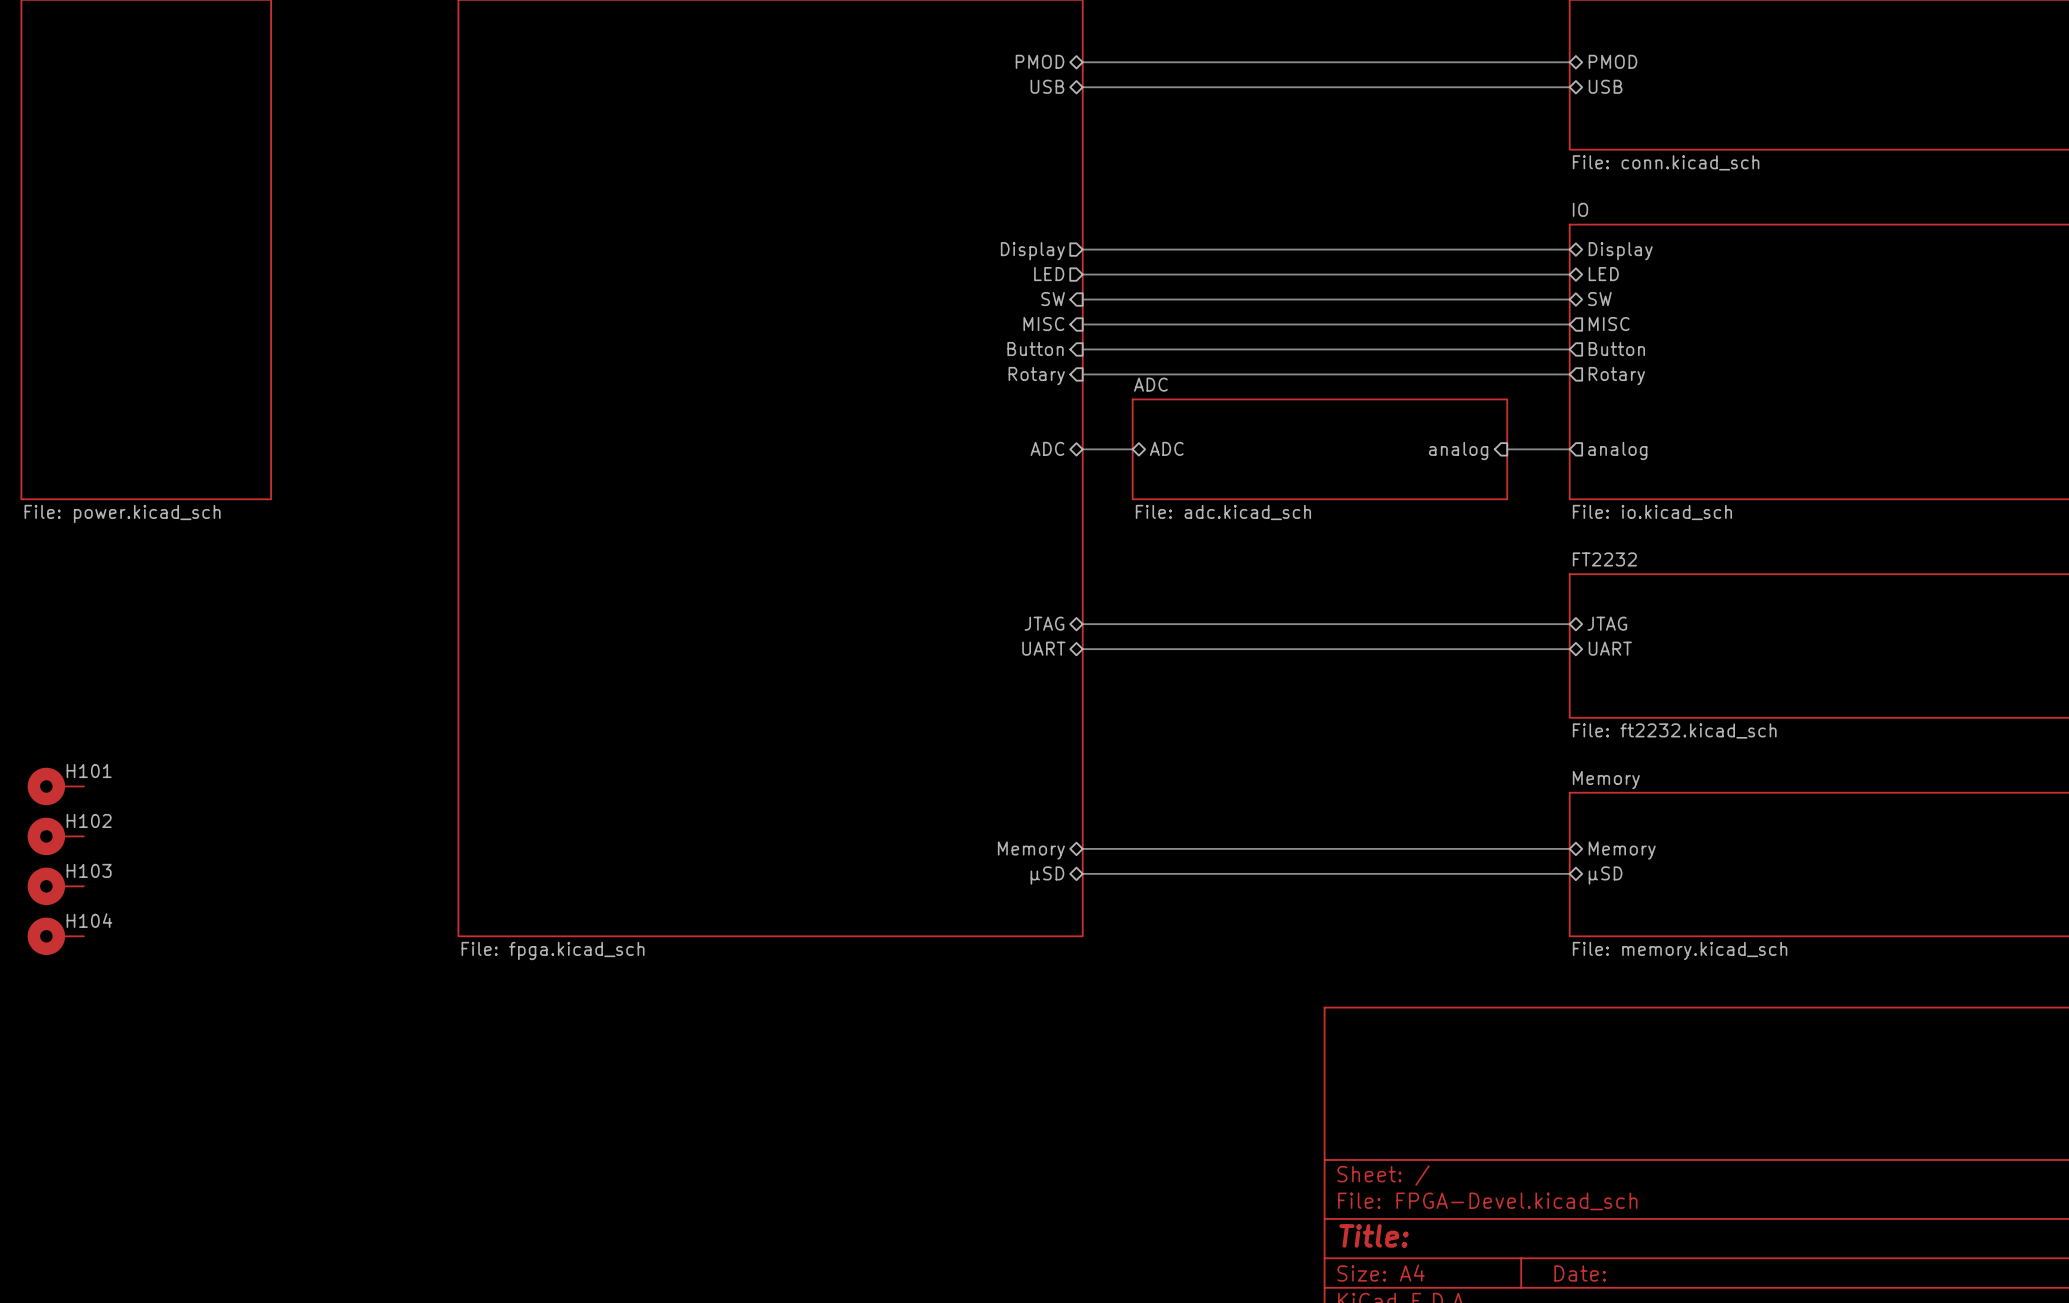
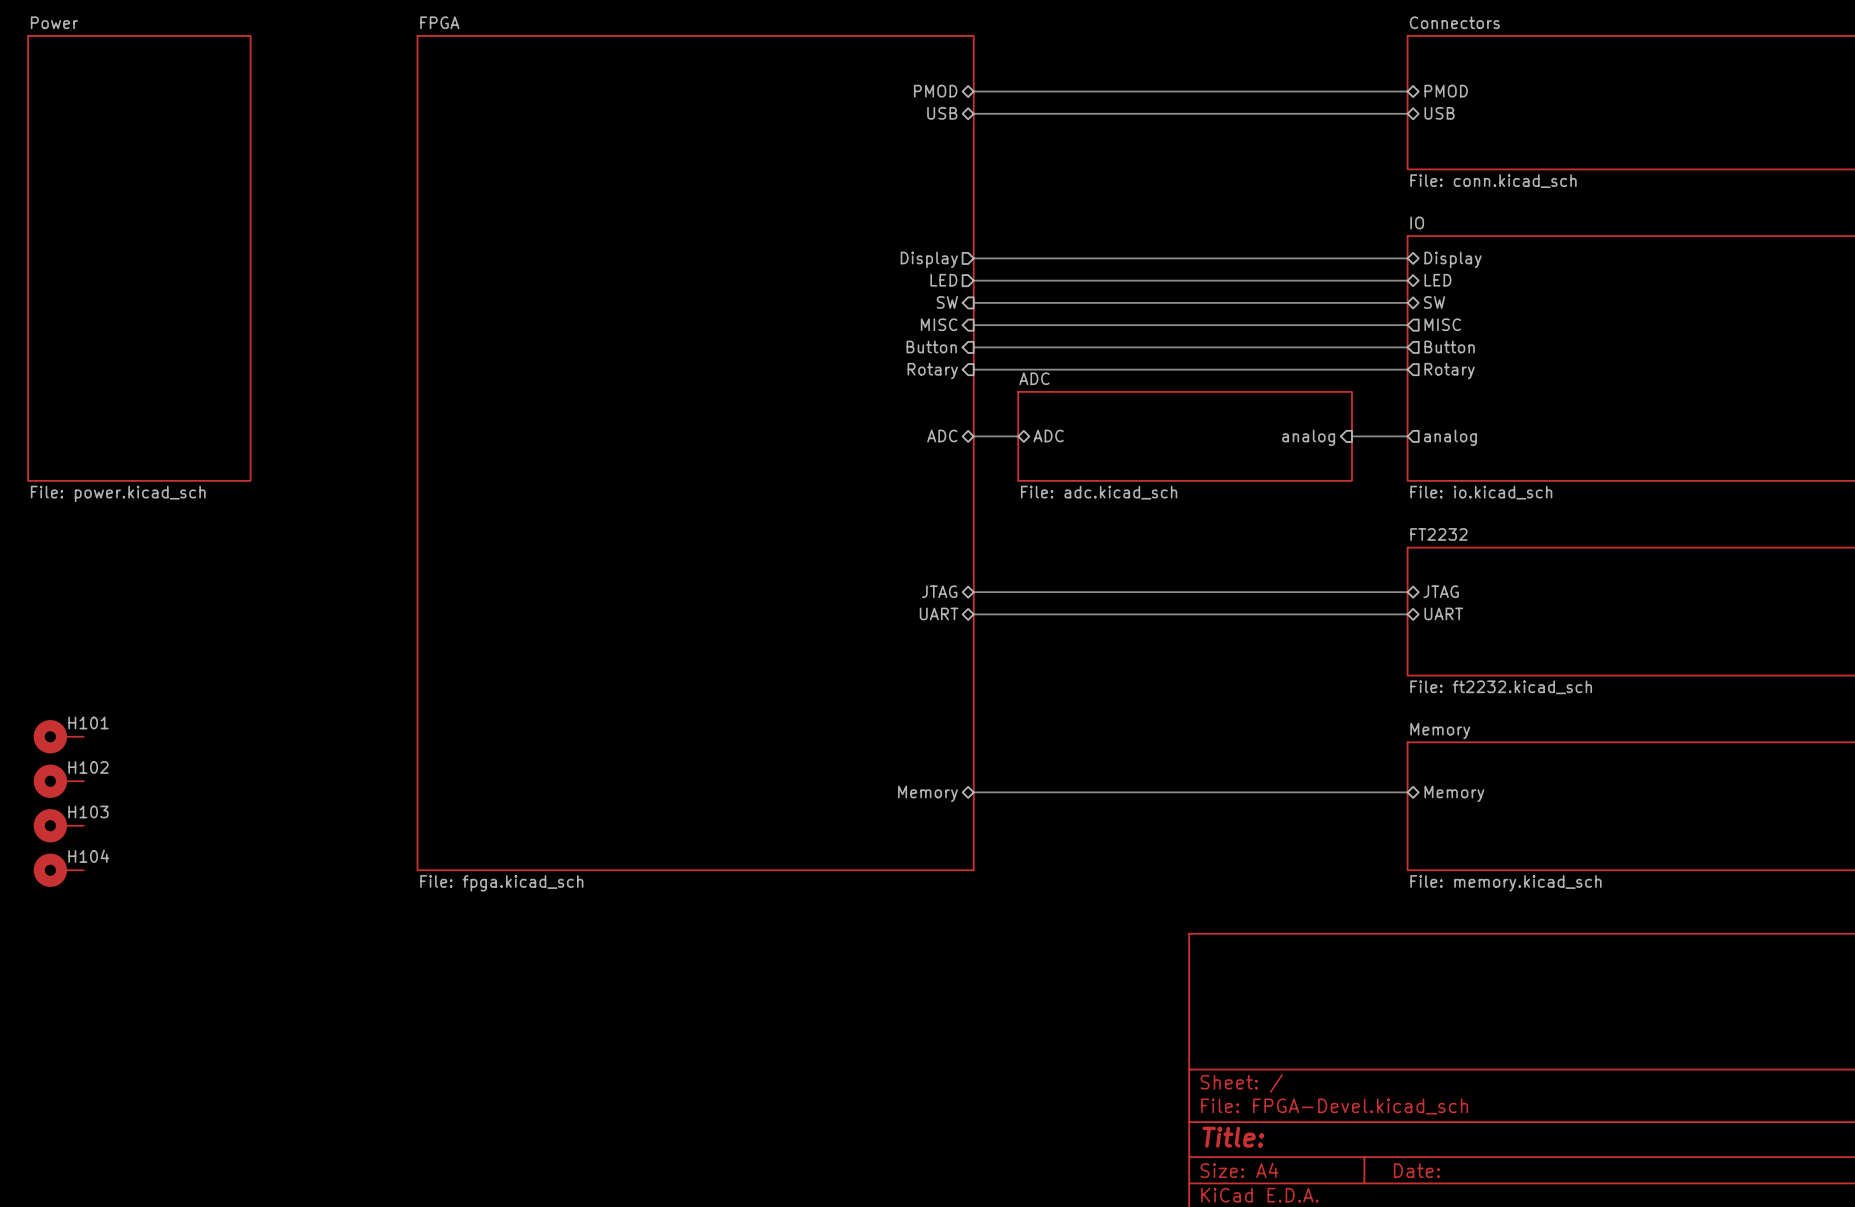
bus: (1082, 873) (1569, 873) -> none
sheet pin: μSD (1047, 875) -> none
sheet pin: μSD (1605, 875) -> none

